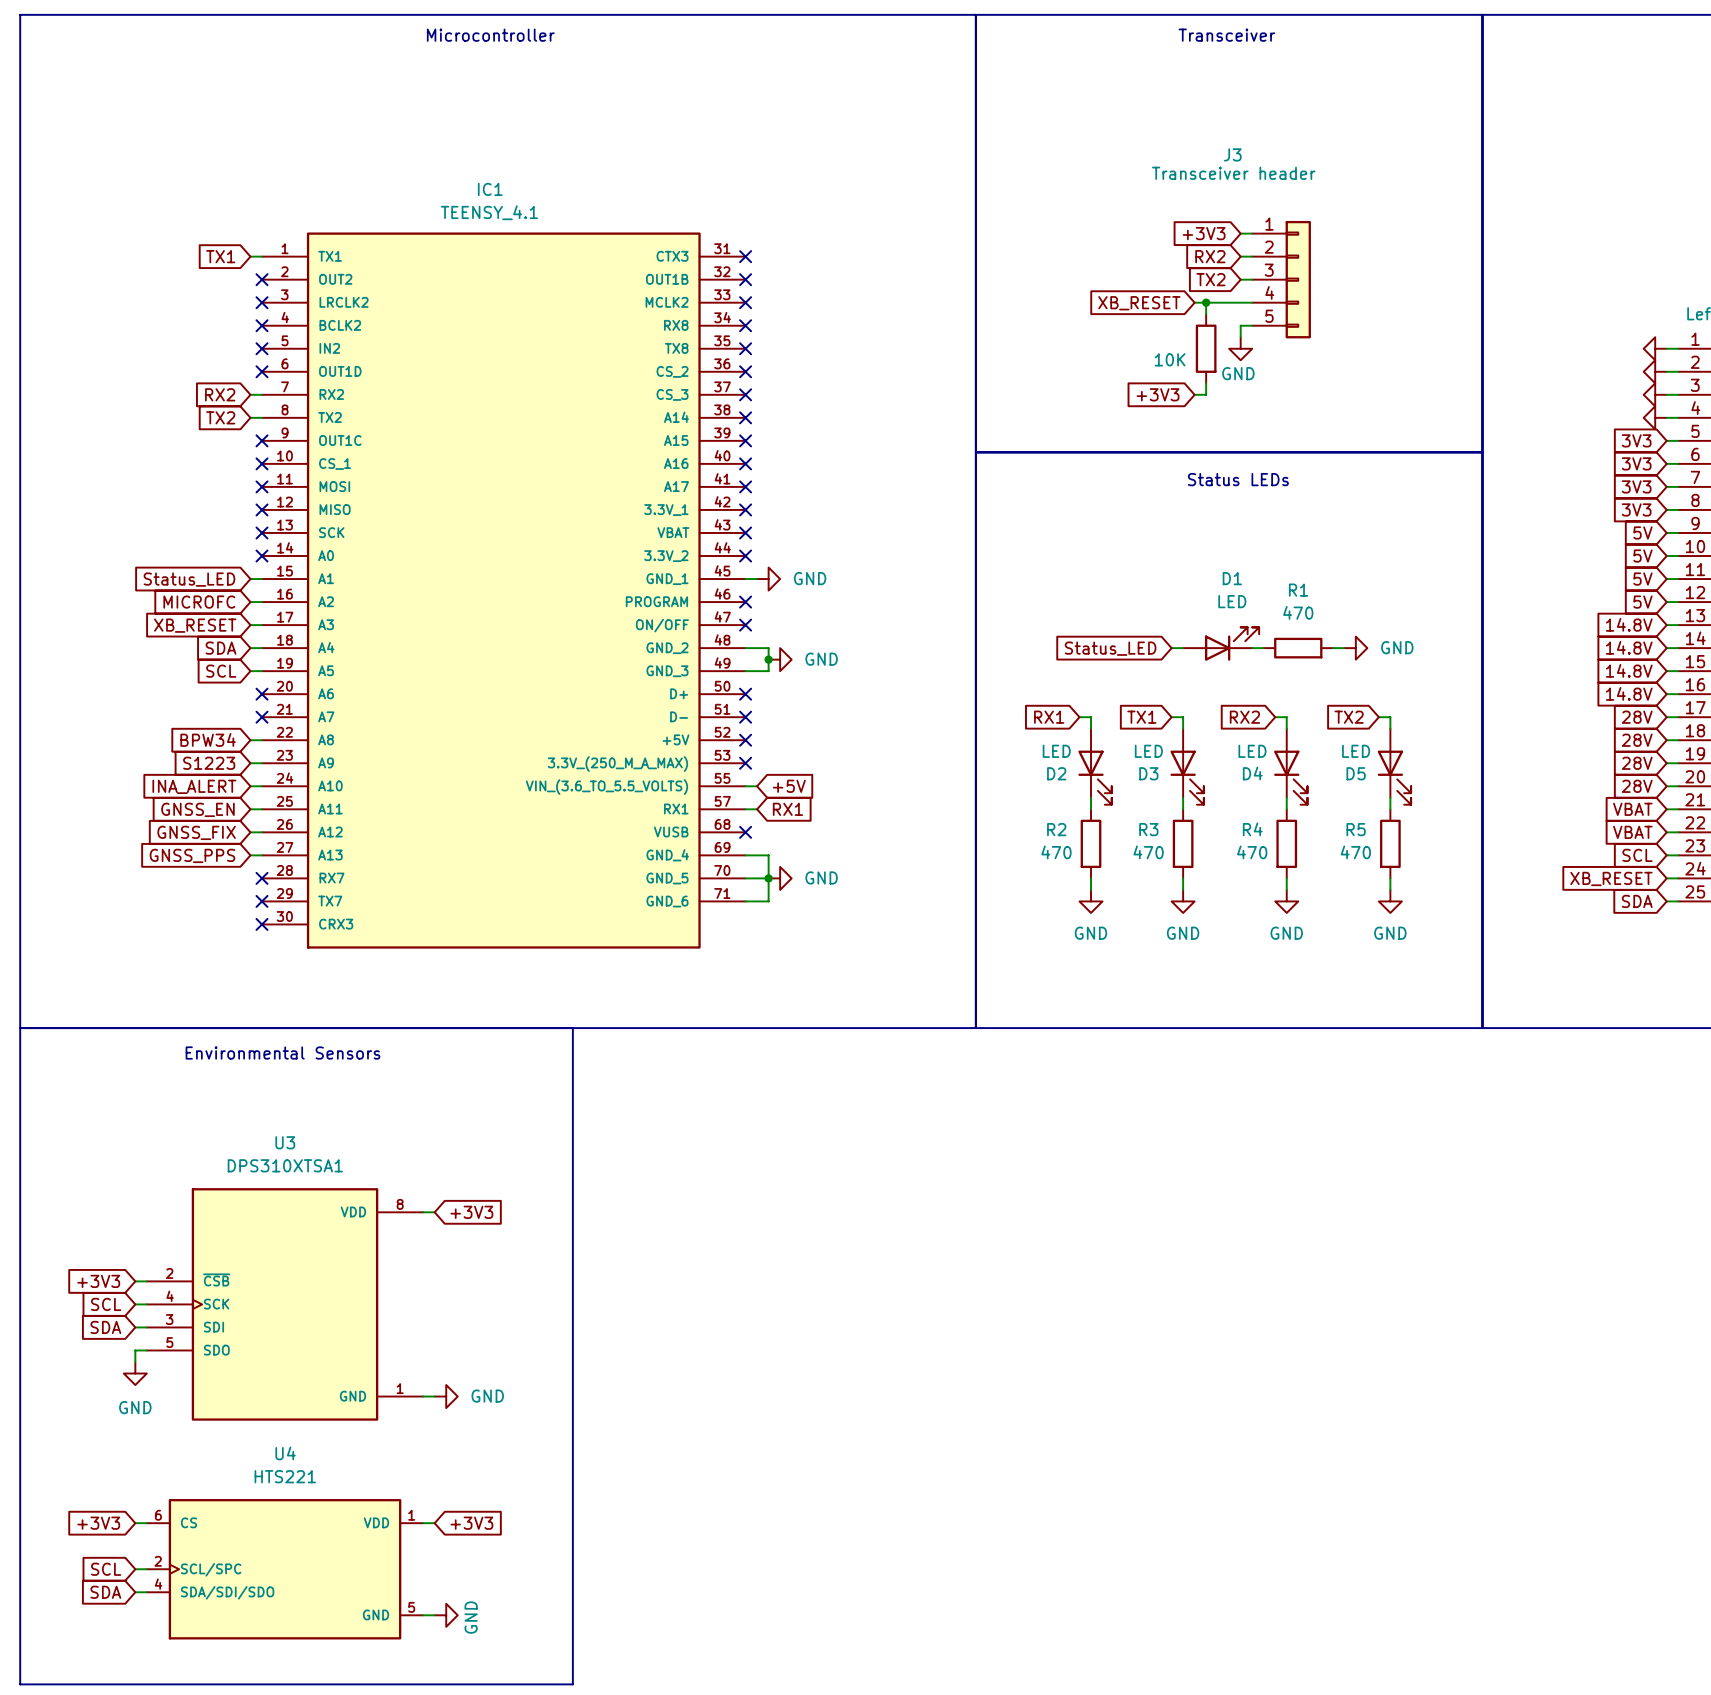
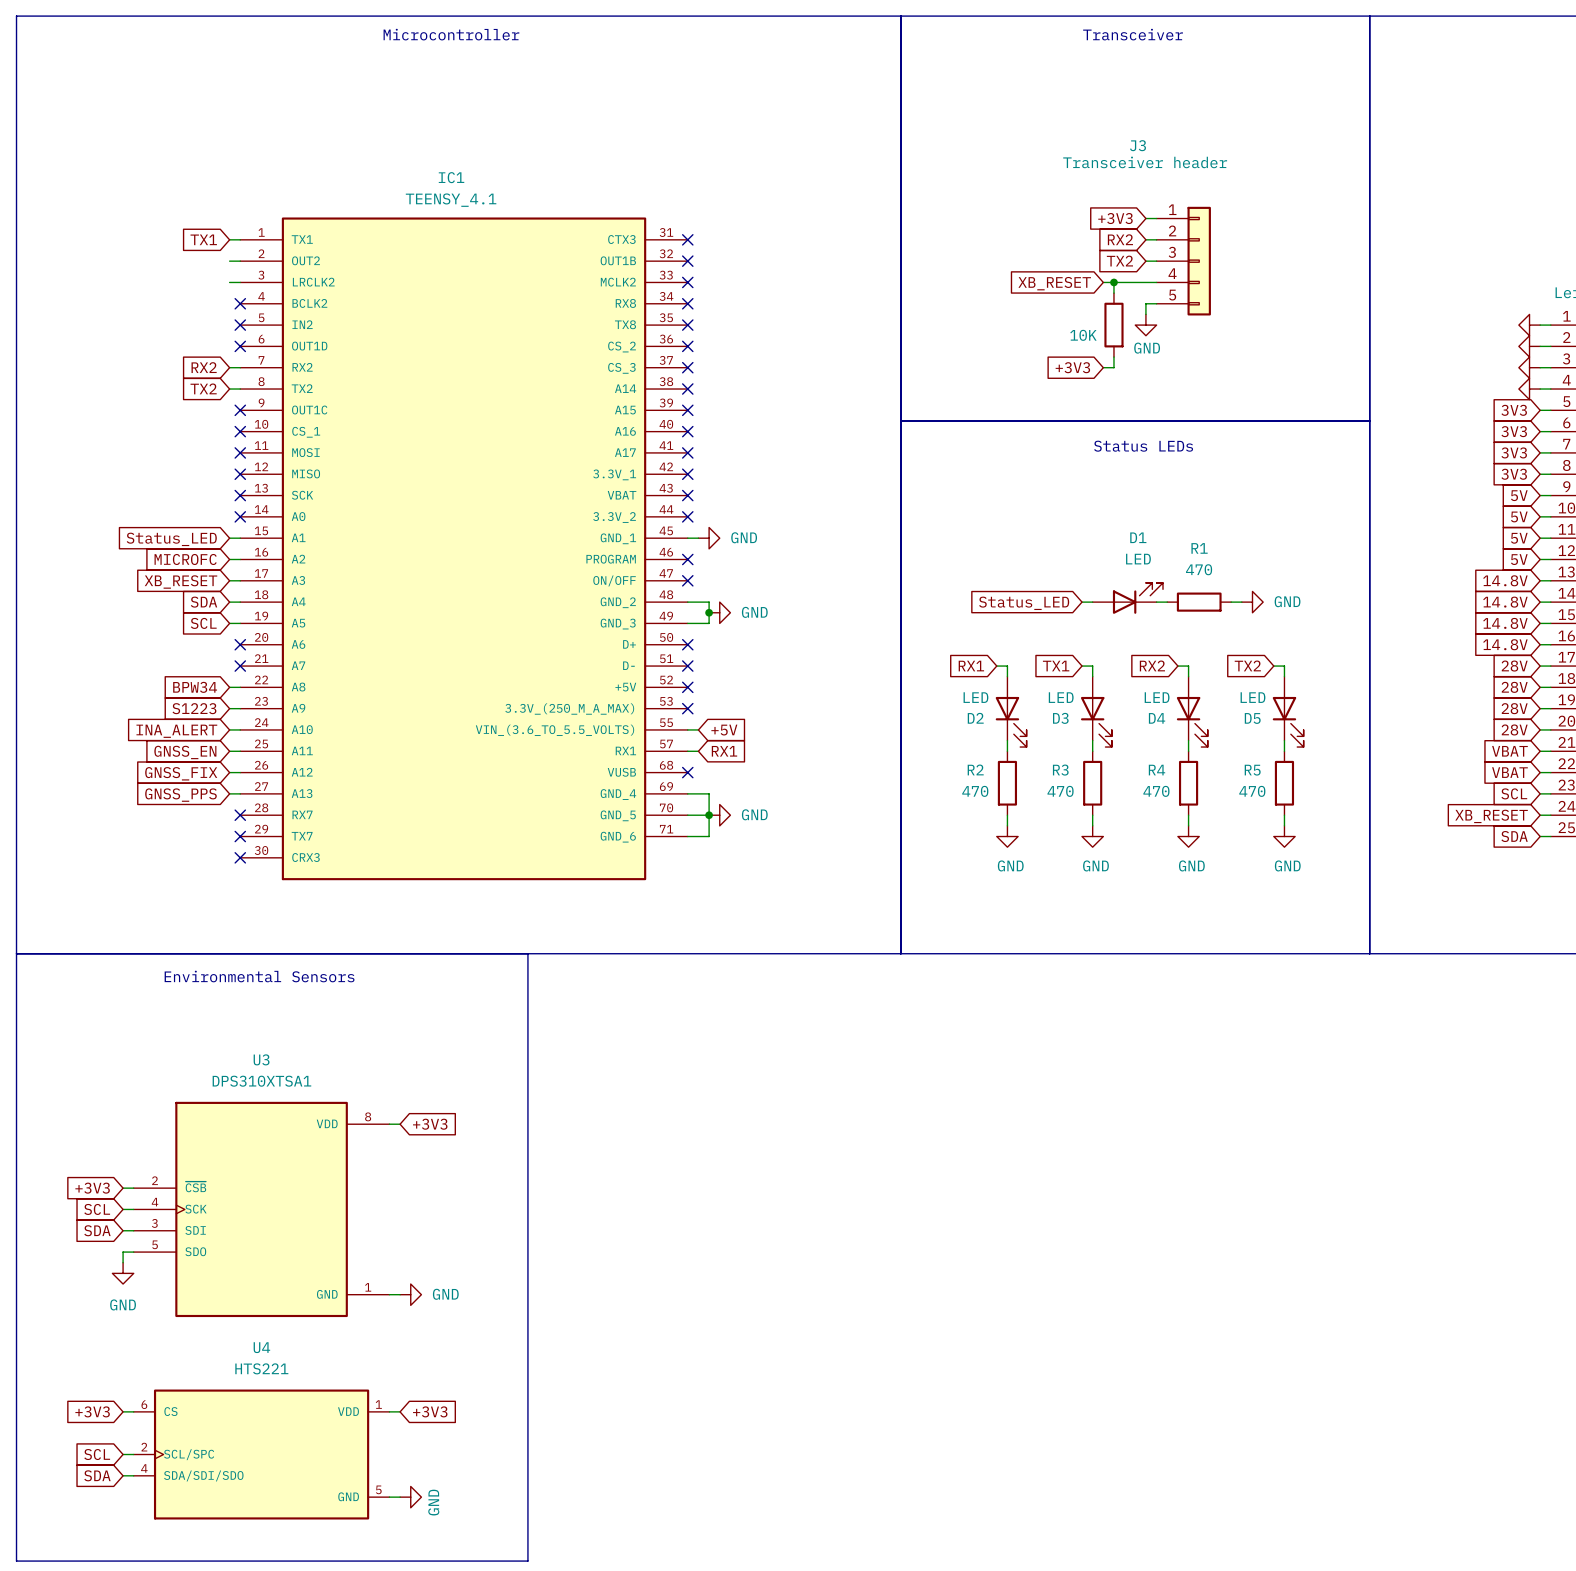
wire: none -> (229, 261) (240, 261)
no-connect mark: (262, 279) -> none
wire: none -> (229, 282) (240, 282)
no-connect mark: (262, 302) -> none

